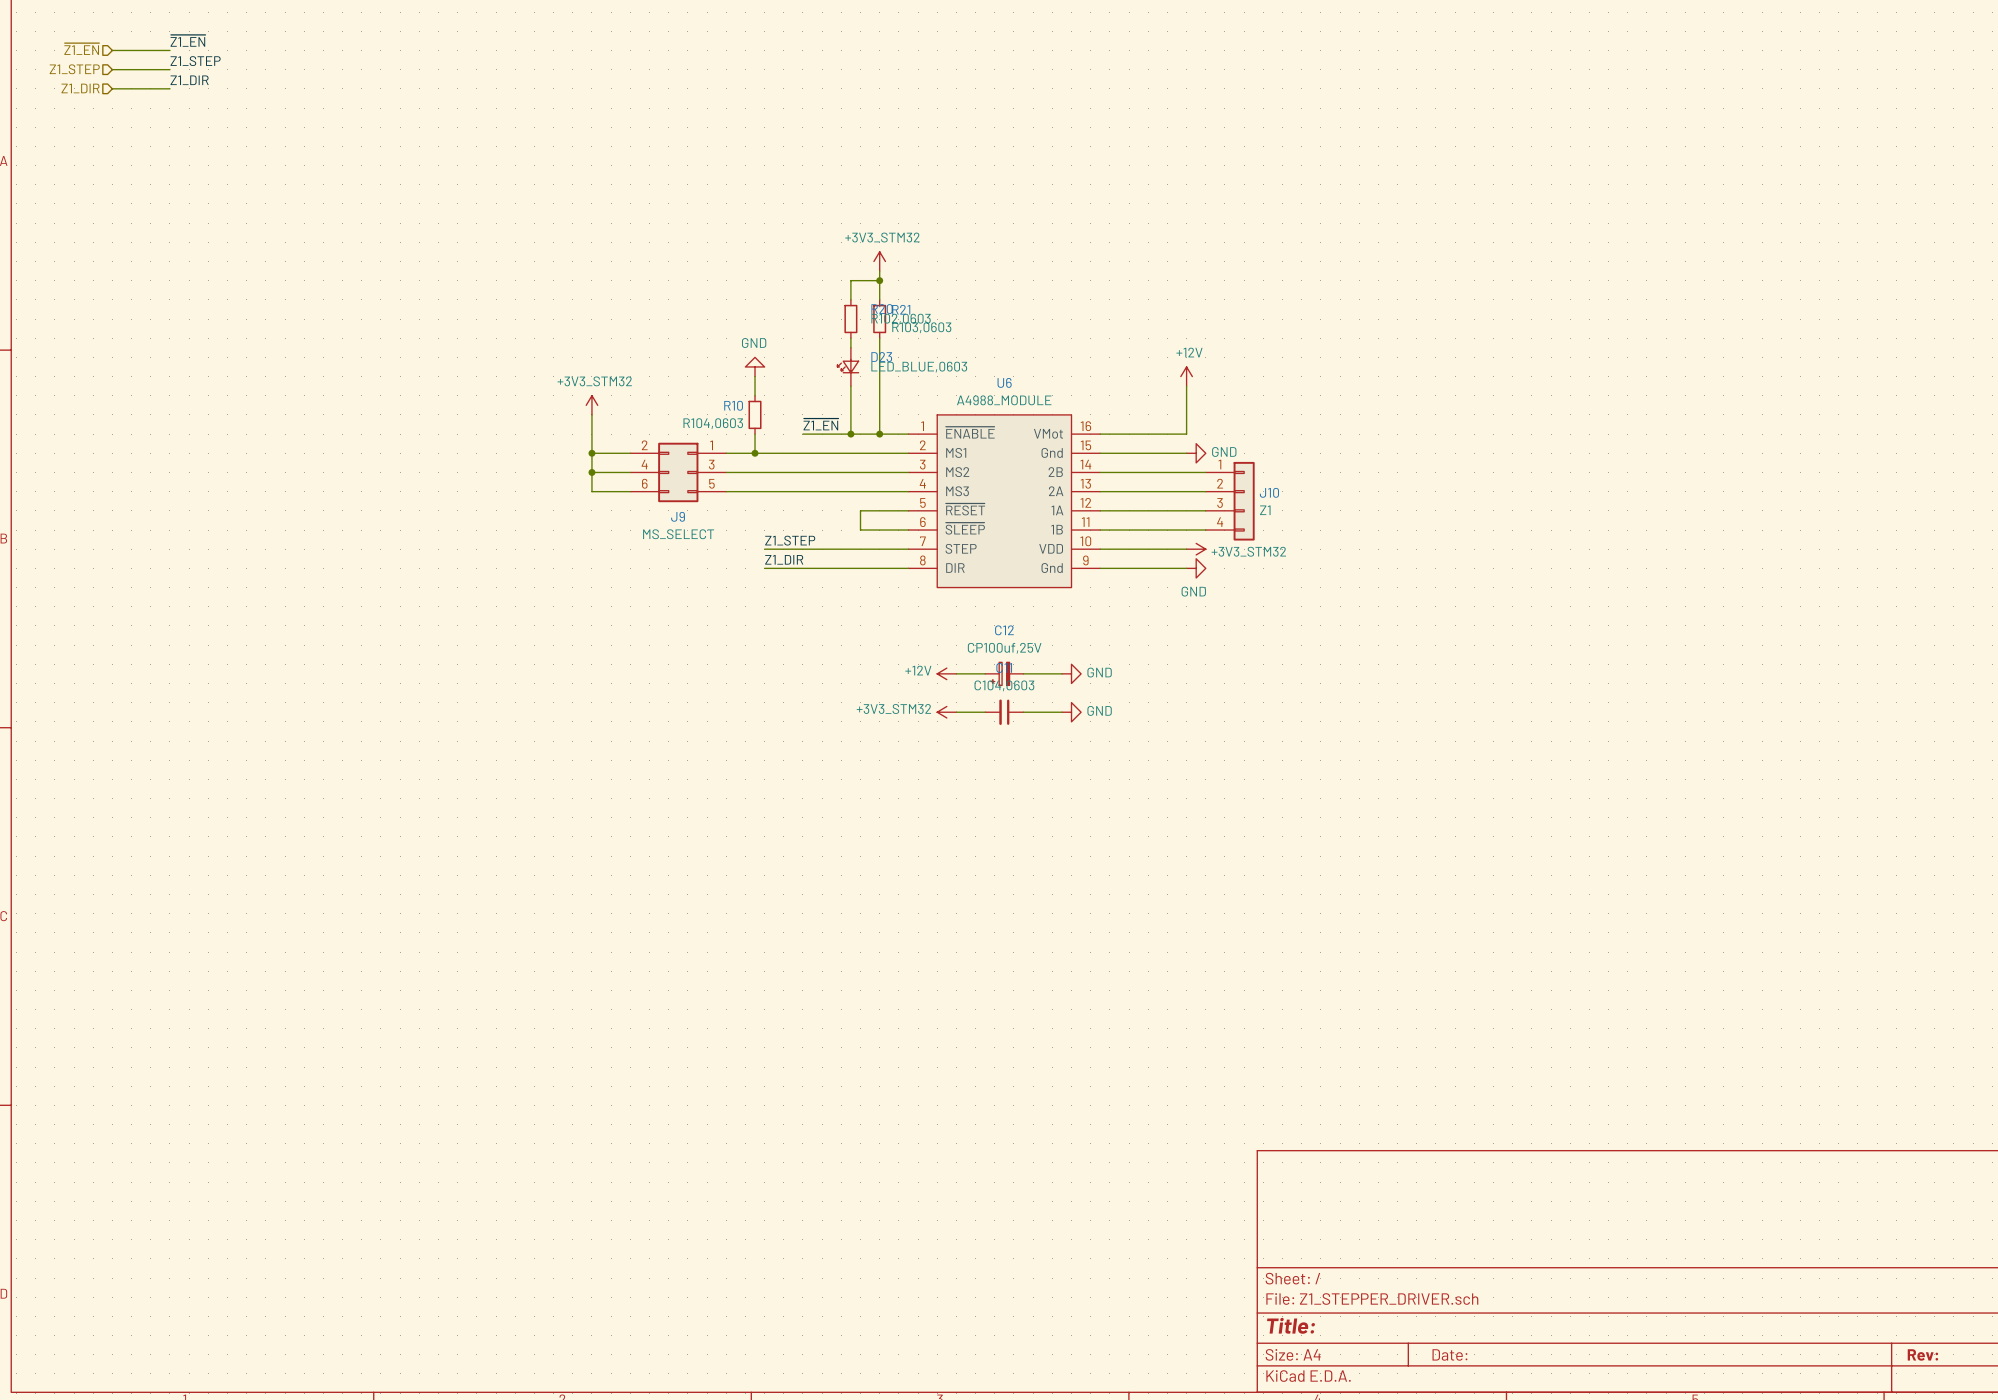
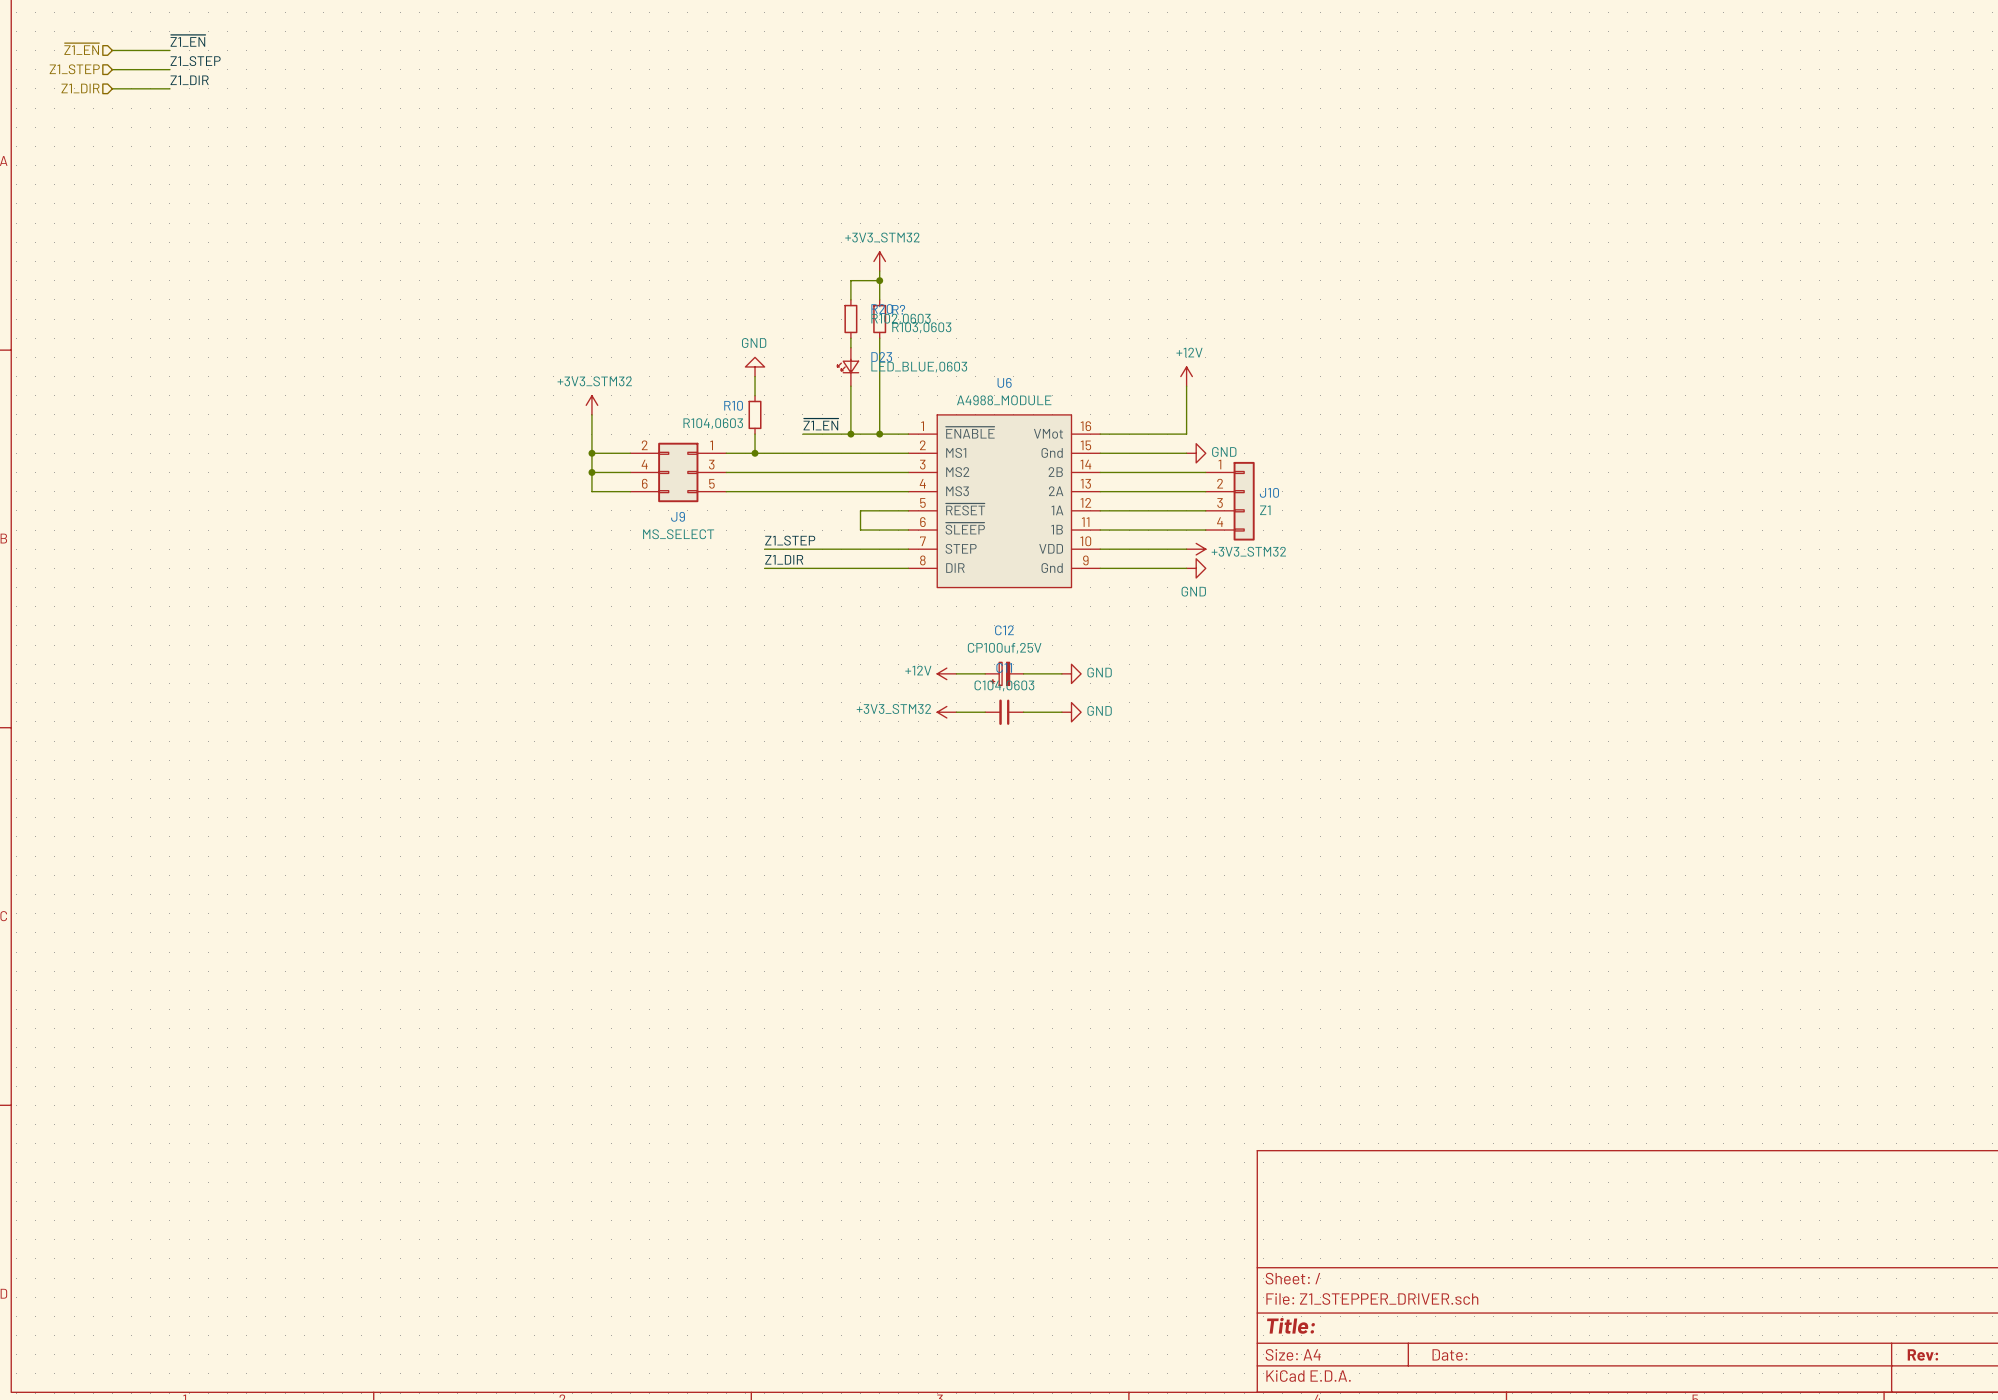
R21 name: R21 (901, 309) -> R? (898, 309)

